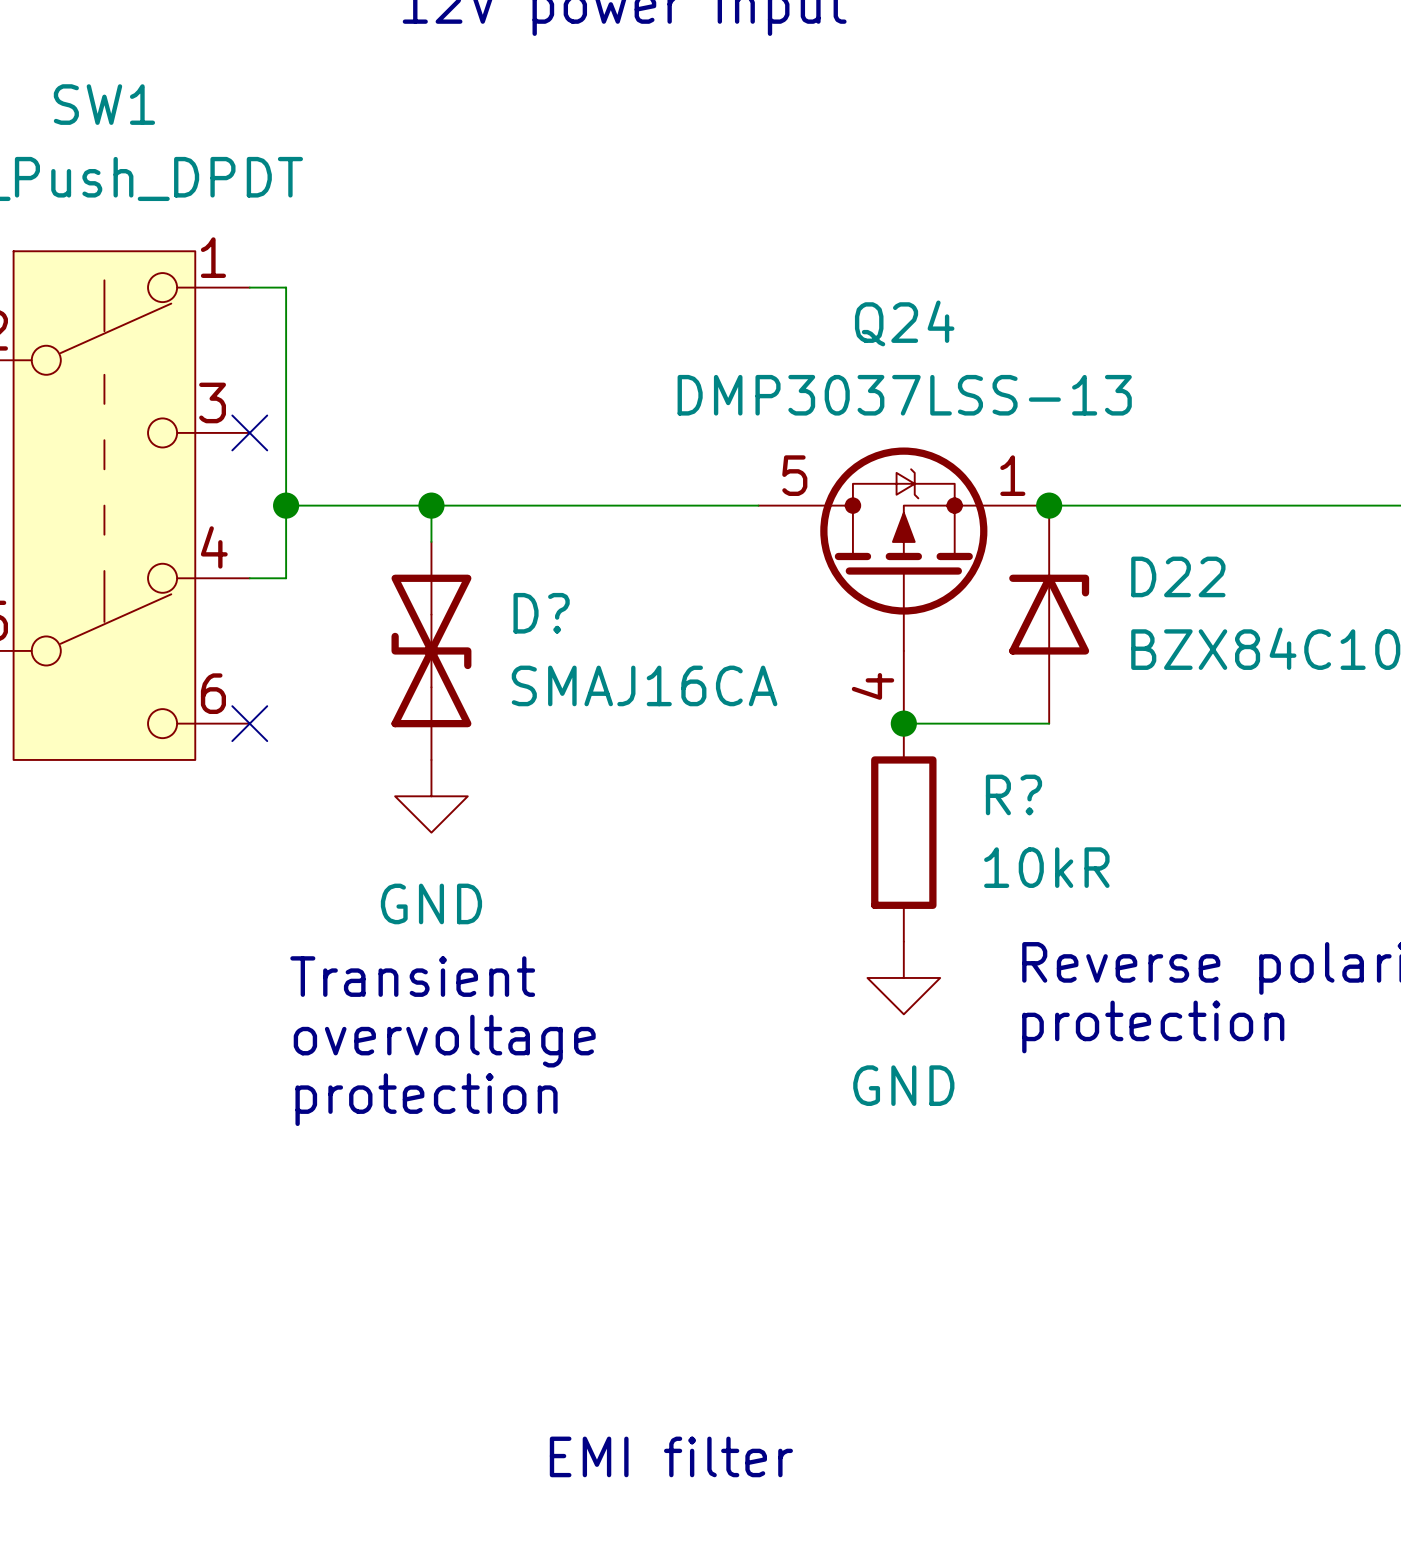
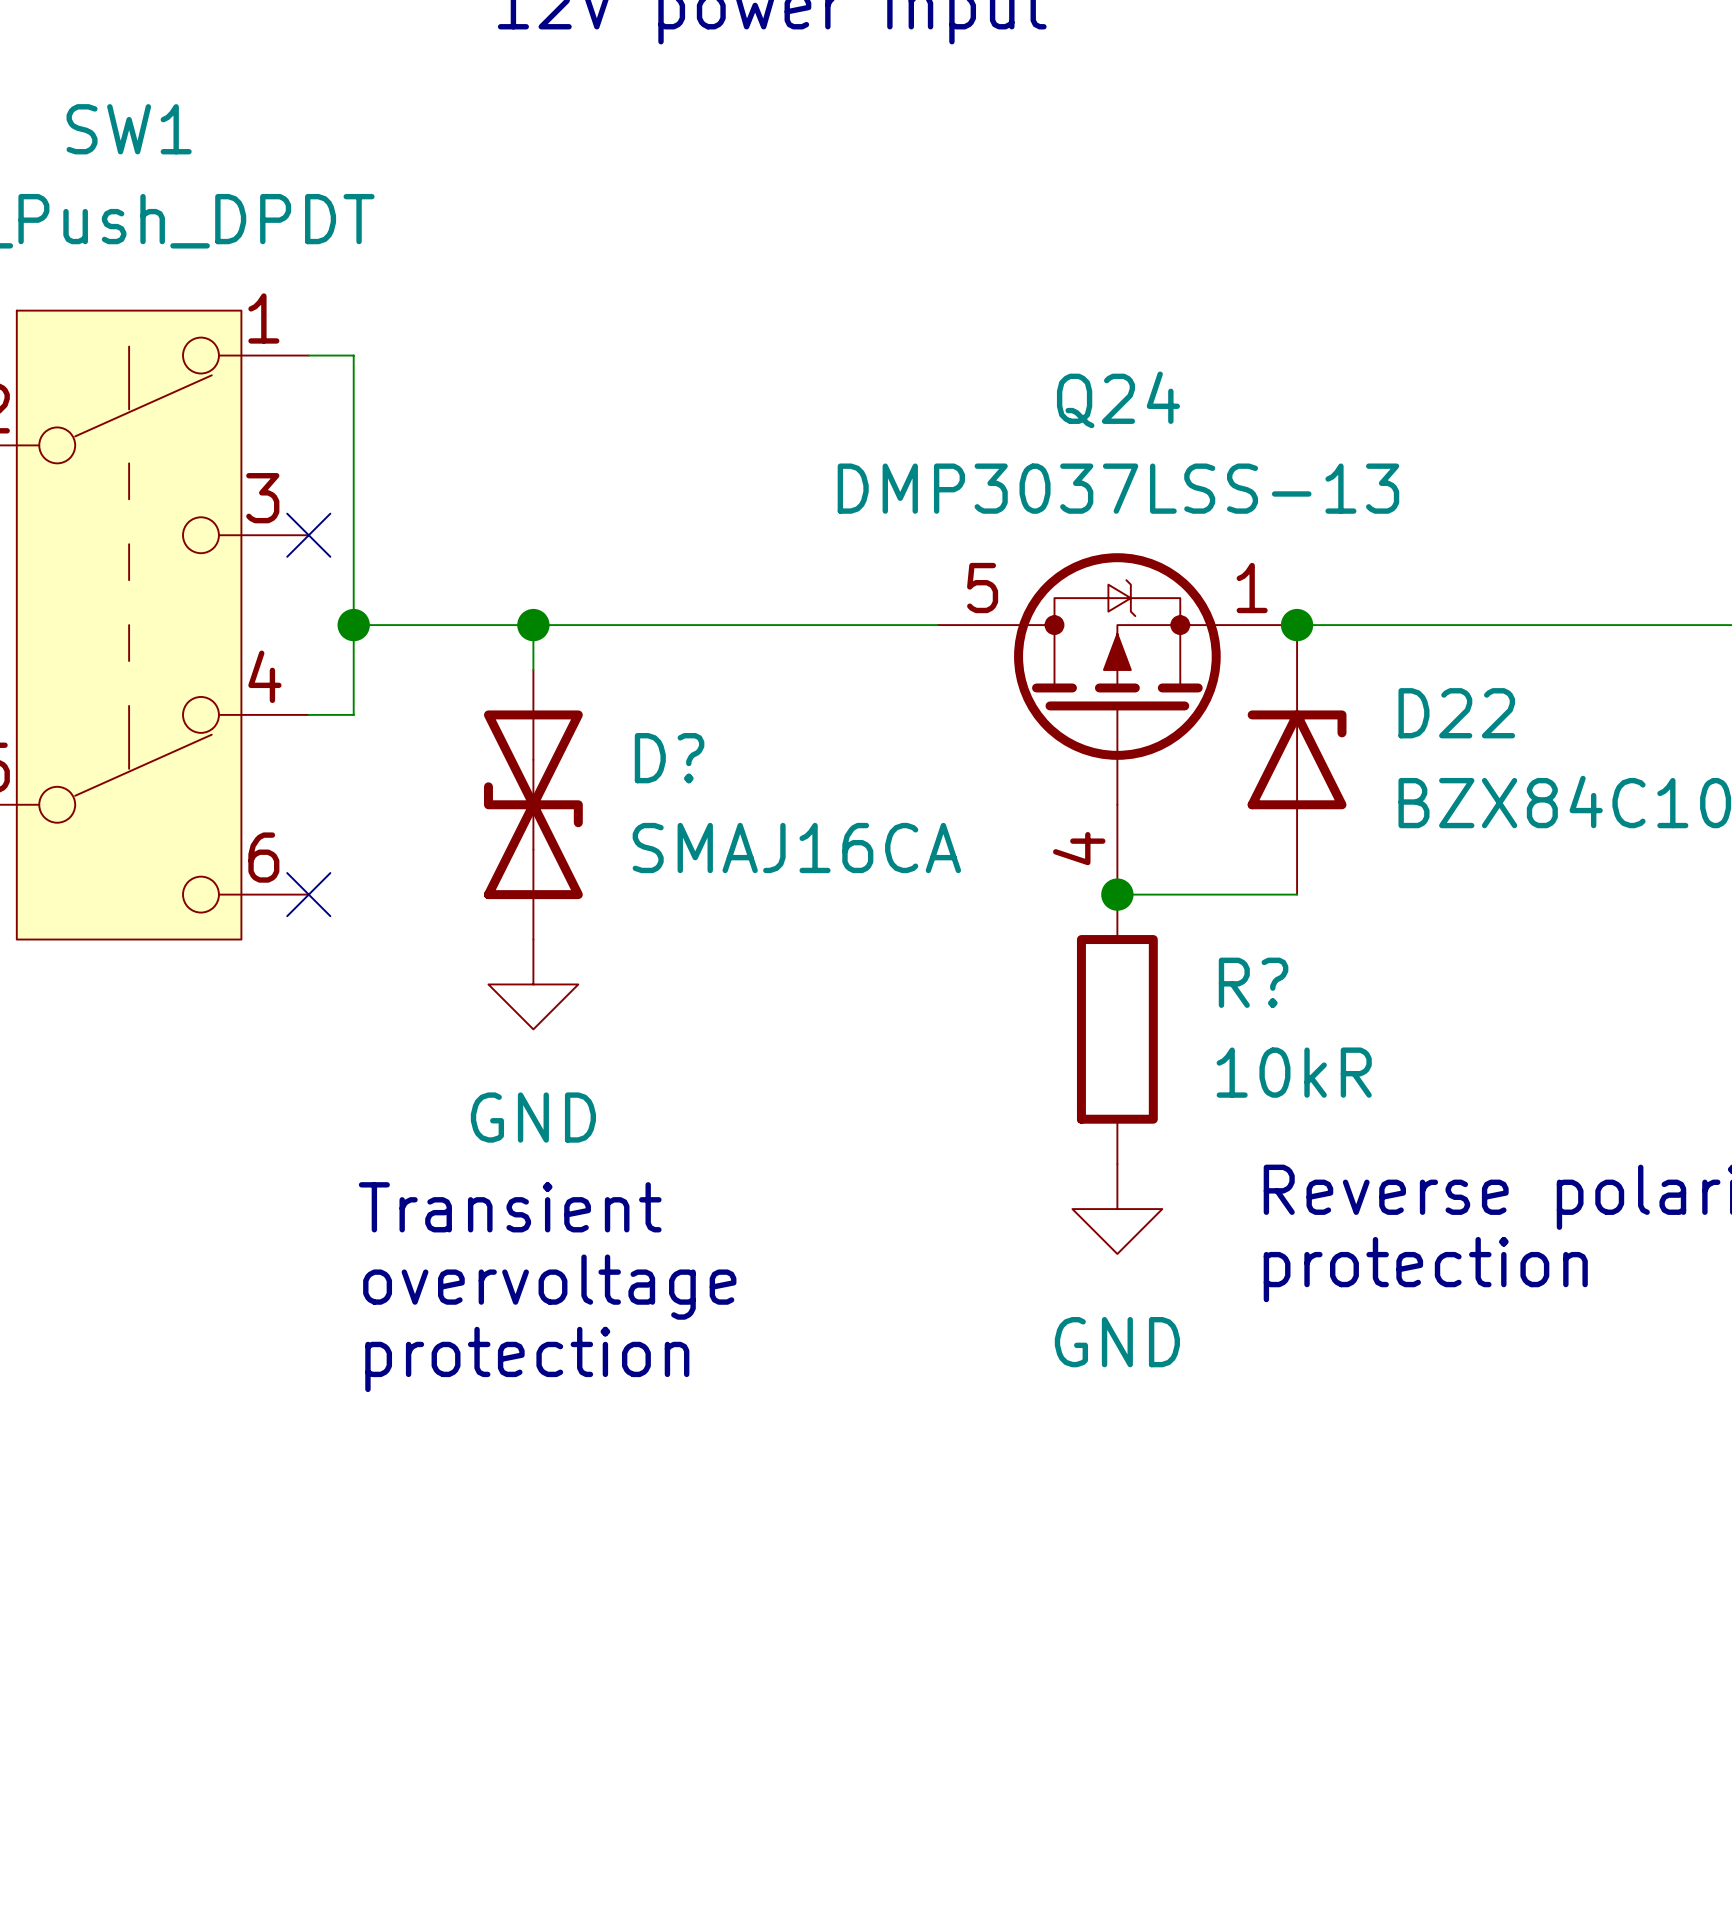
text: EMI filter (671, 1456) -> none

